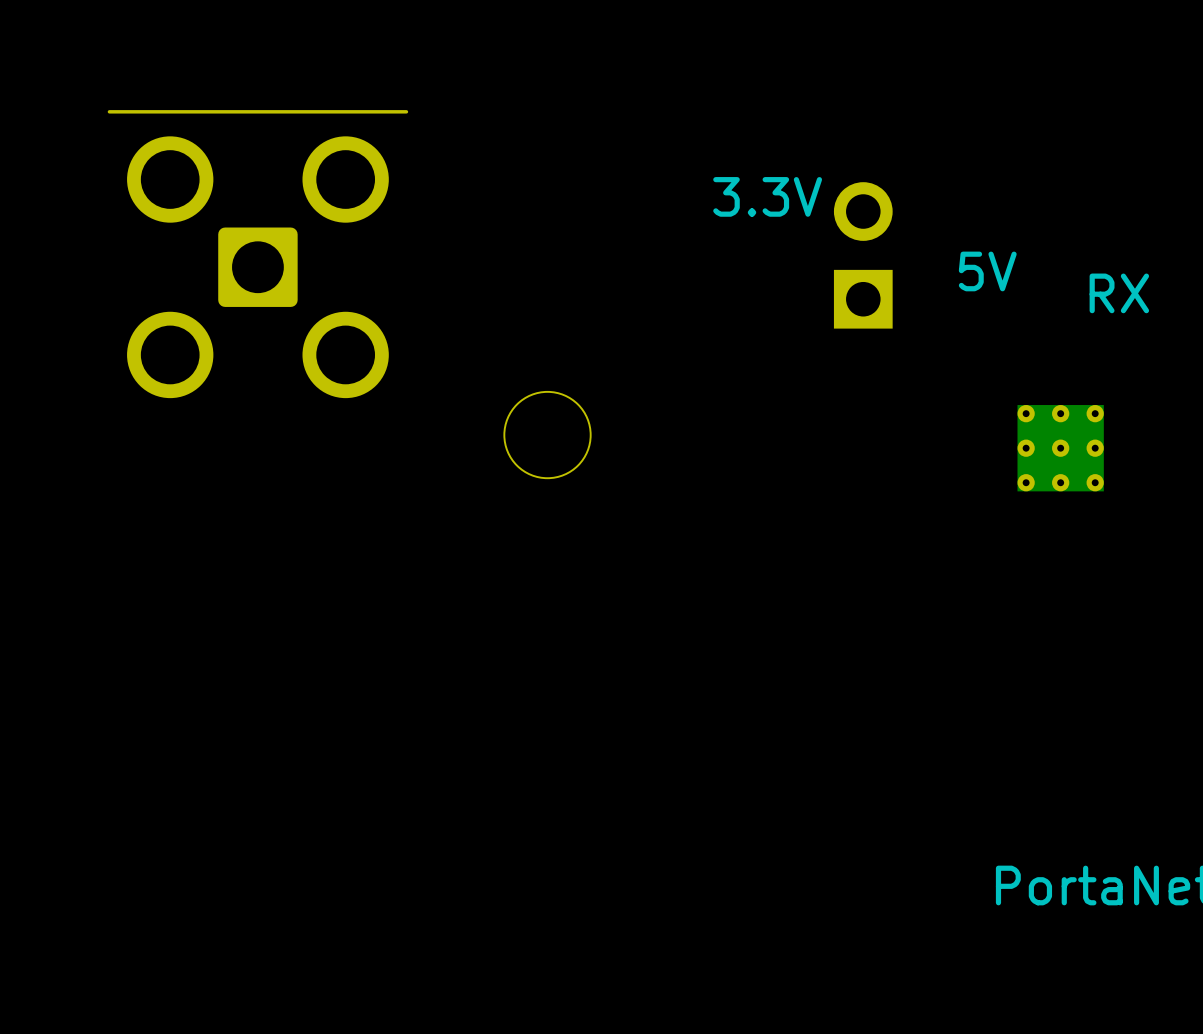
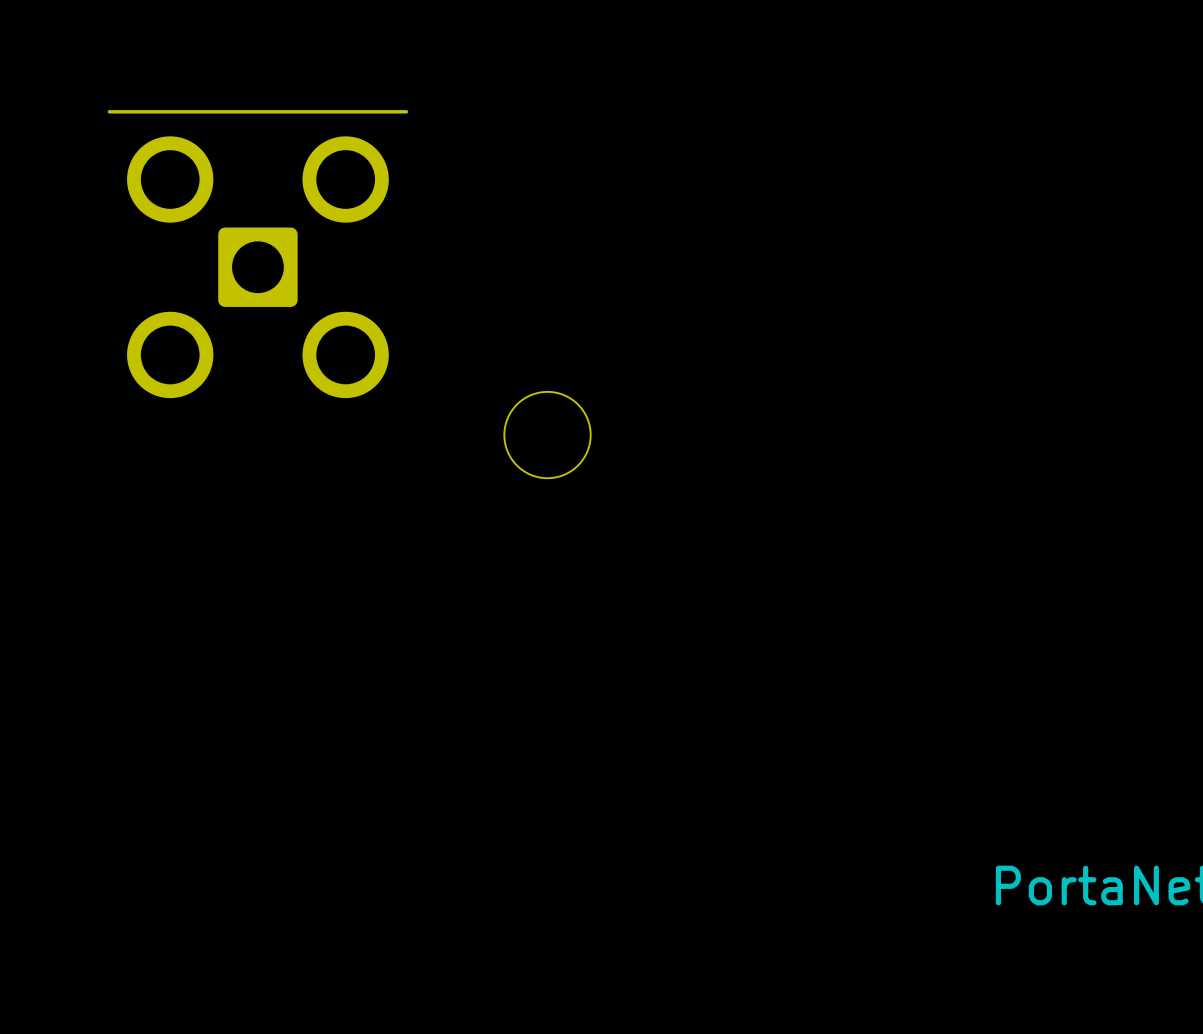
text: 3.3V (767, 196) -> none
part: (863, 255) -> none
text: 5V (987, 271) -> none
text: RX (1119, 293) -> none
part: (1060, 448) -> none

